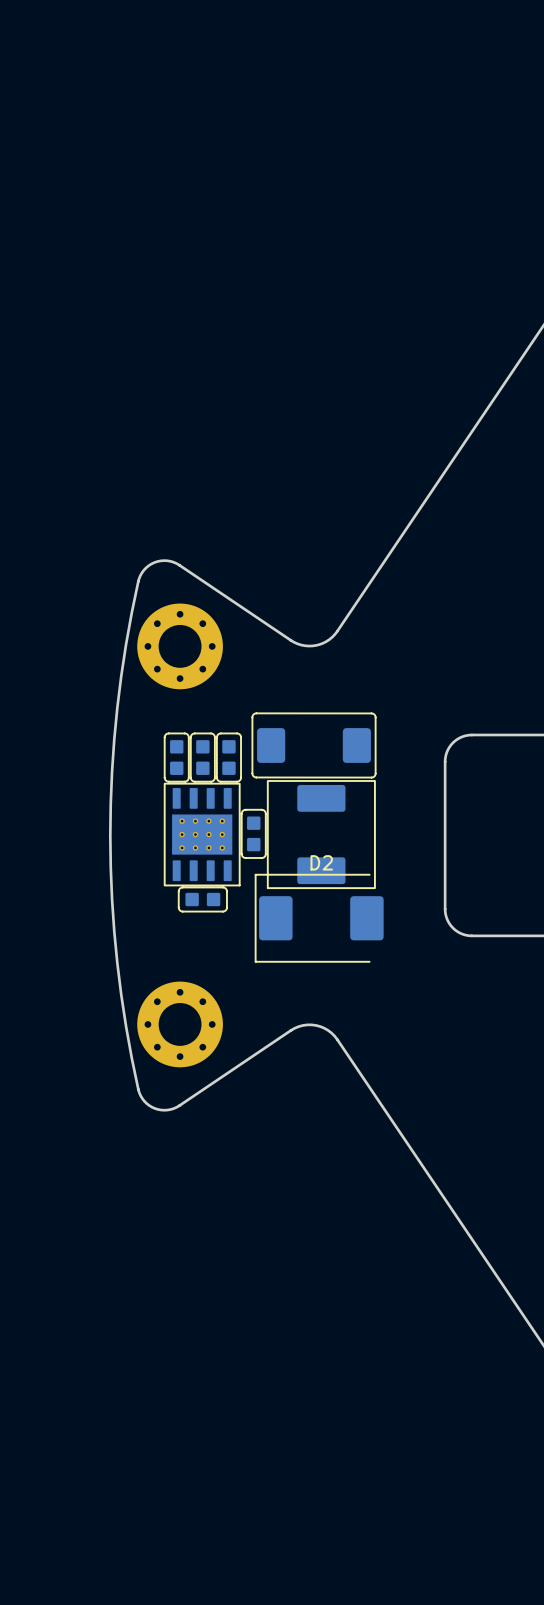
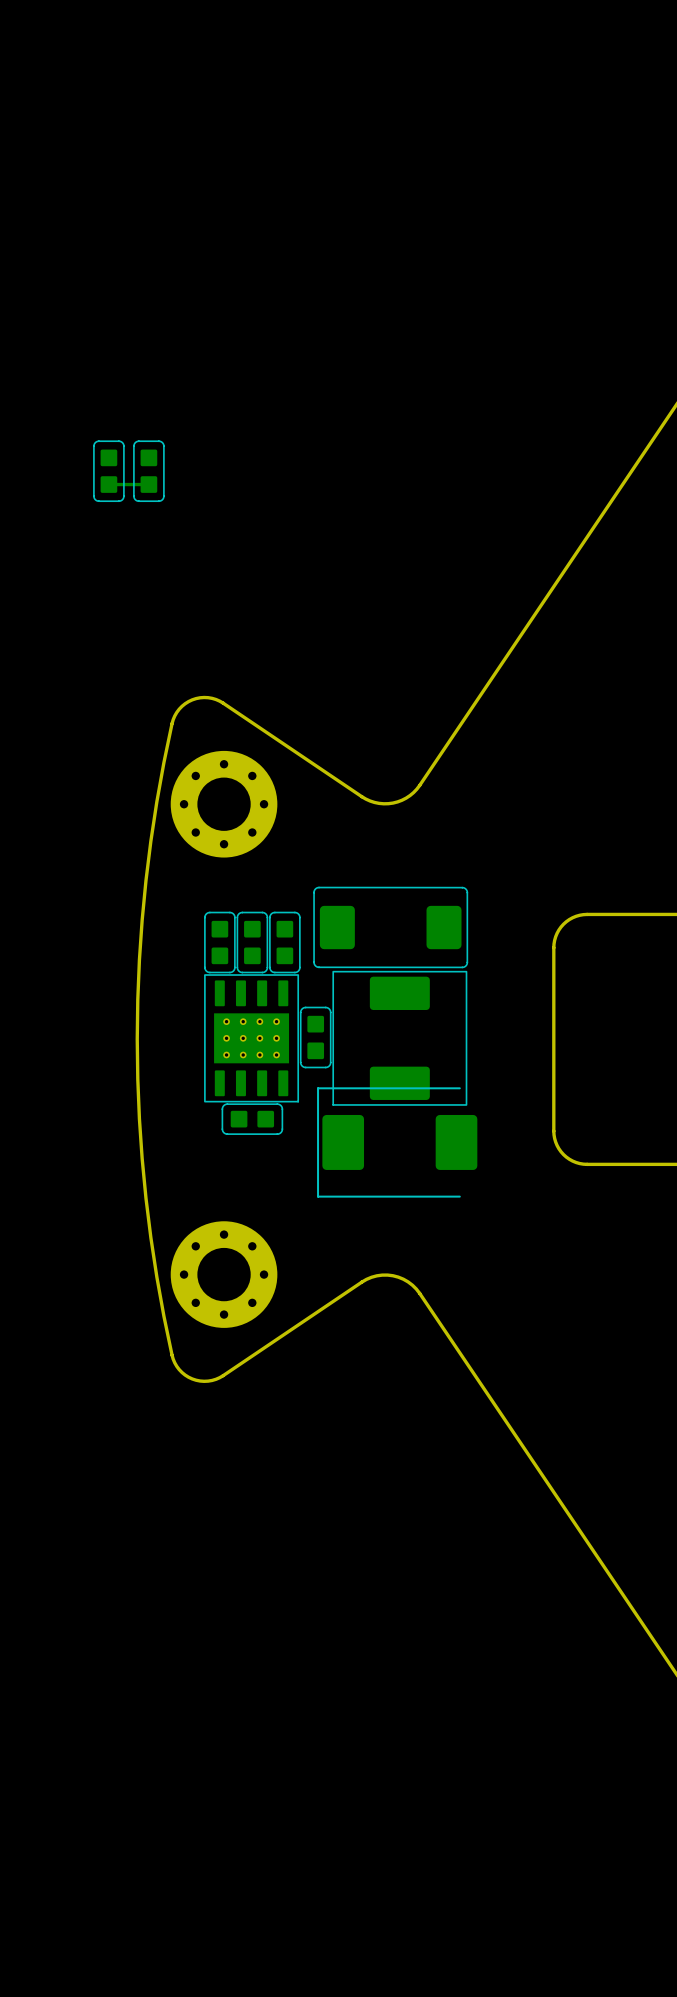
part: none -> (108, 471)
part: none -> (148, 471)
bottom track: none -> (148, 484) (108, 484)
D2 name: D2 (321, 862) -> none

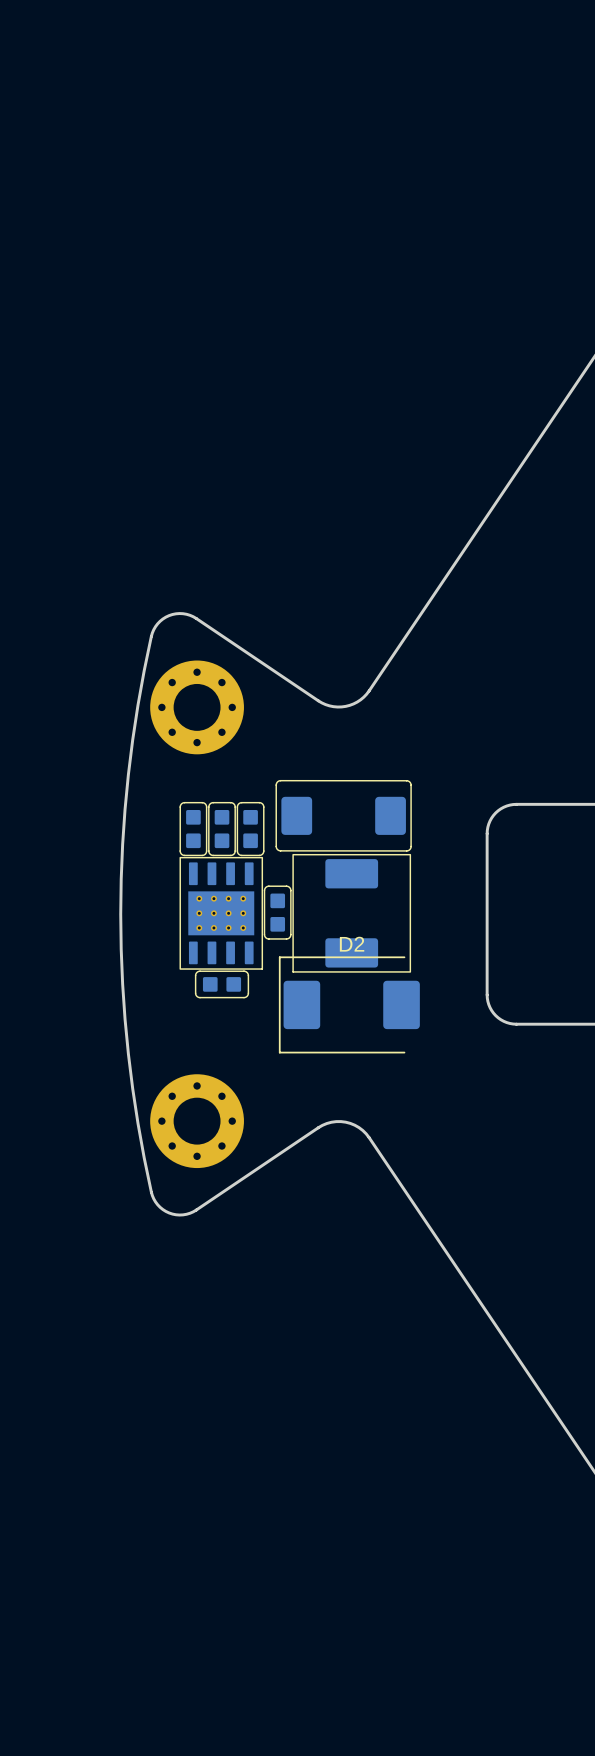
part: (108, 471) -> none
part: (148, 471) -> none
bottom track: (148, 484) (108, 484) -> none
D2 name: none -> D2 (352, 944)

